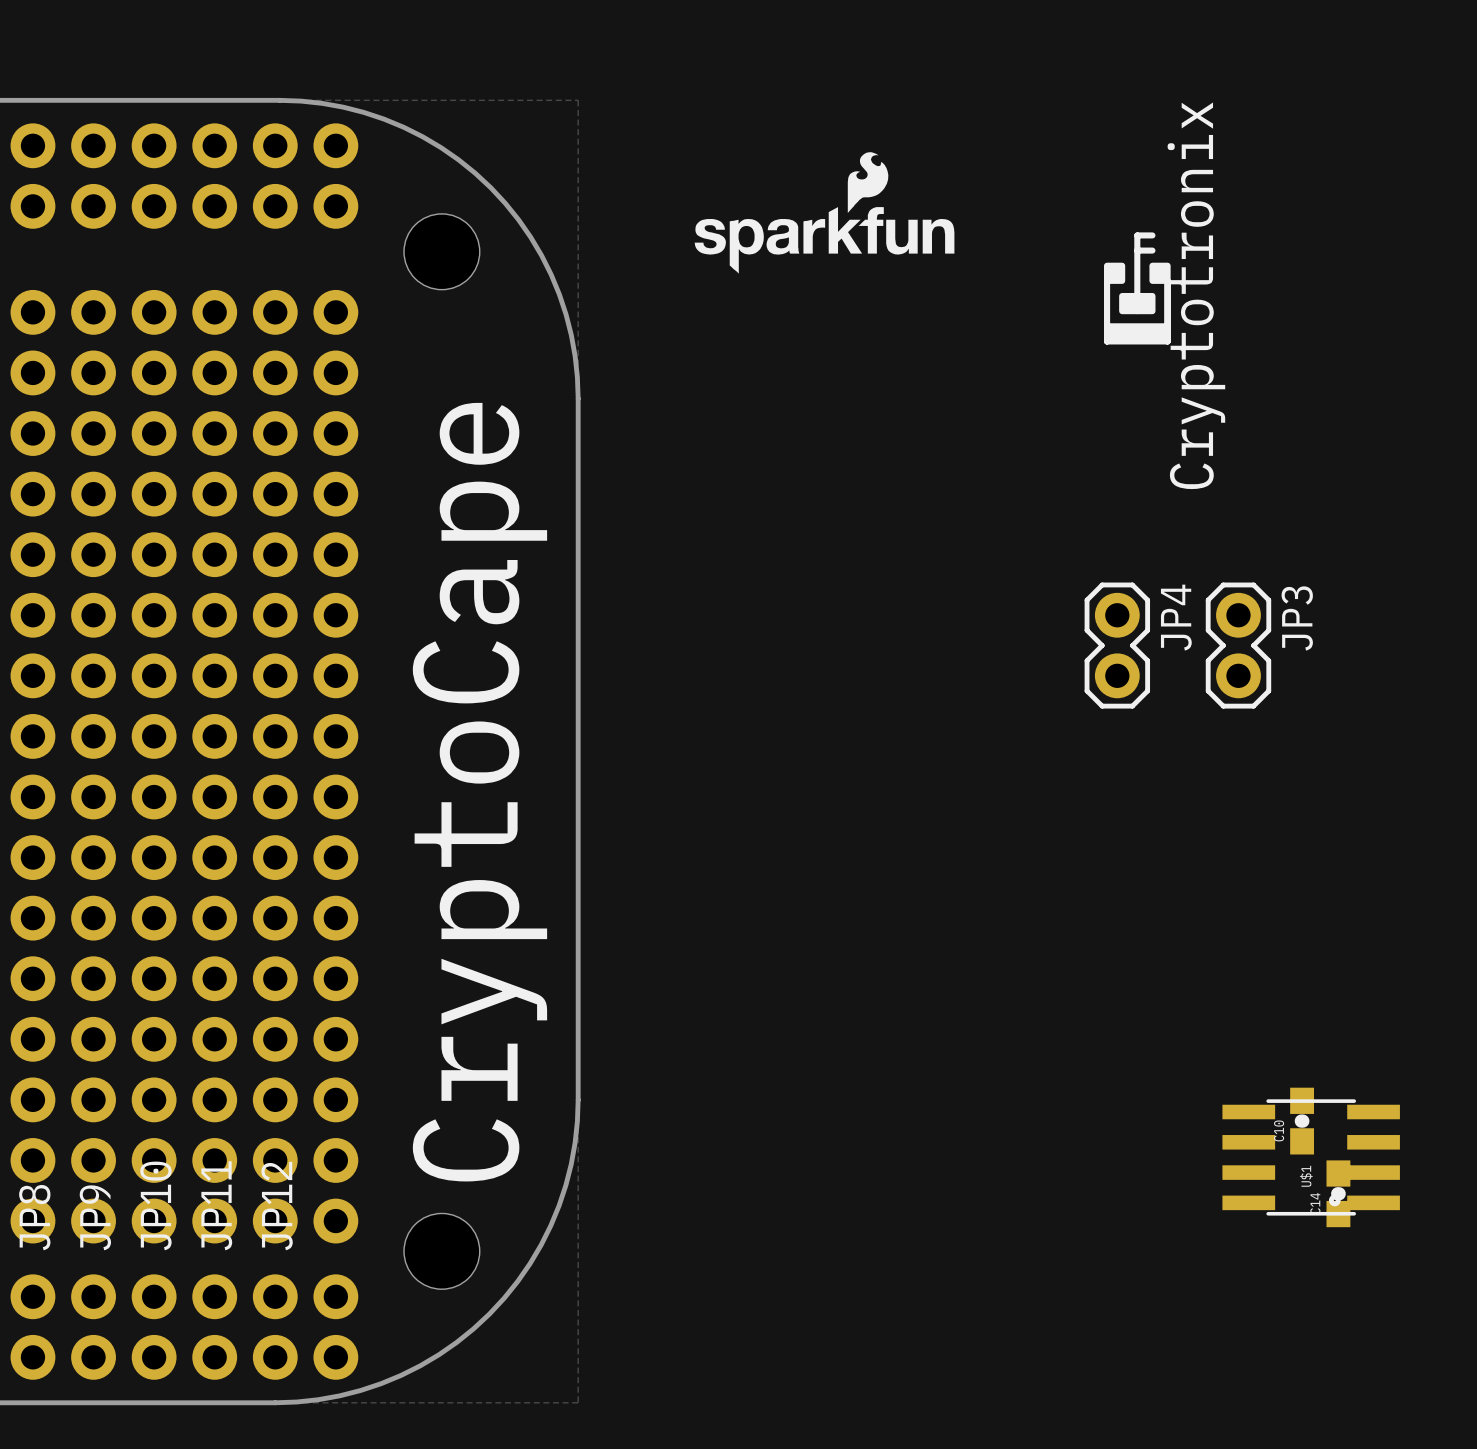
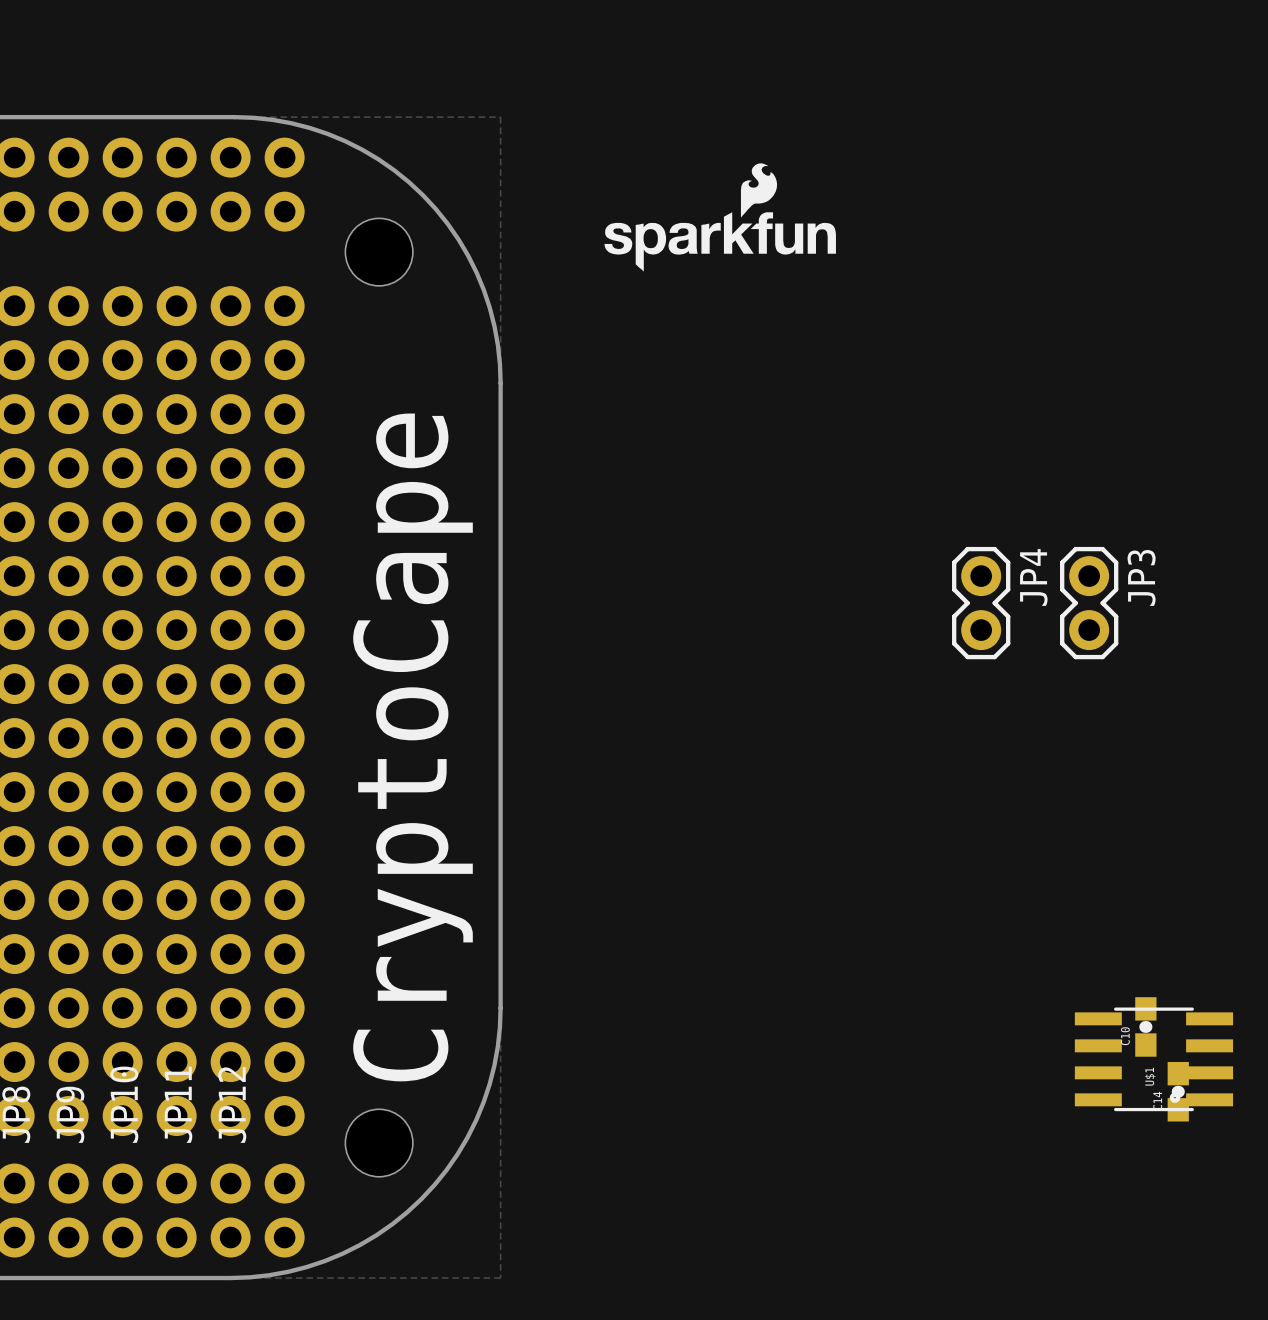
line: (1152, 235) (1137, 235) (1137, 311) -> none
line: (1137, 250) (1152, 250) -> none
drawing: [1104, 262, 1171, 345] -> none
text: Cryptotronix (1196, 295) -> none

